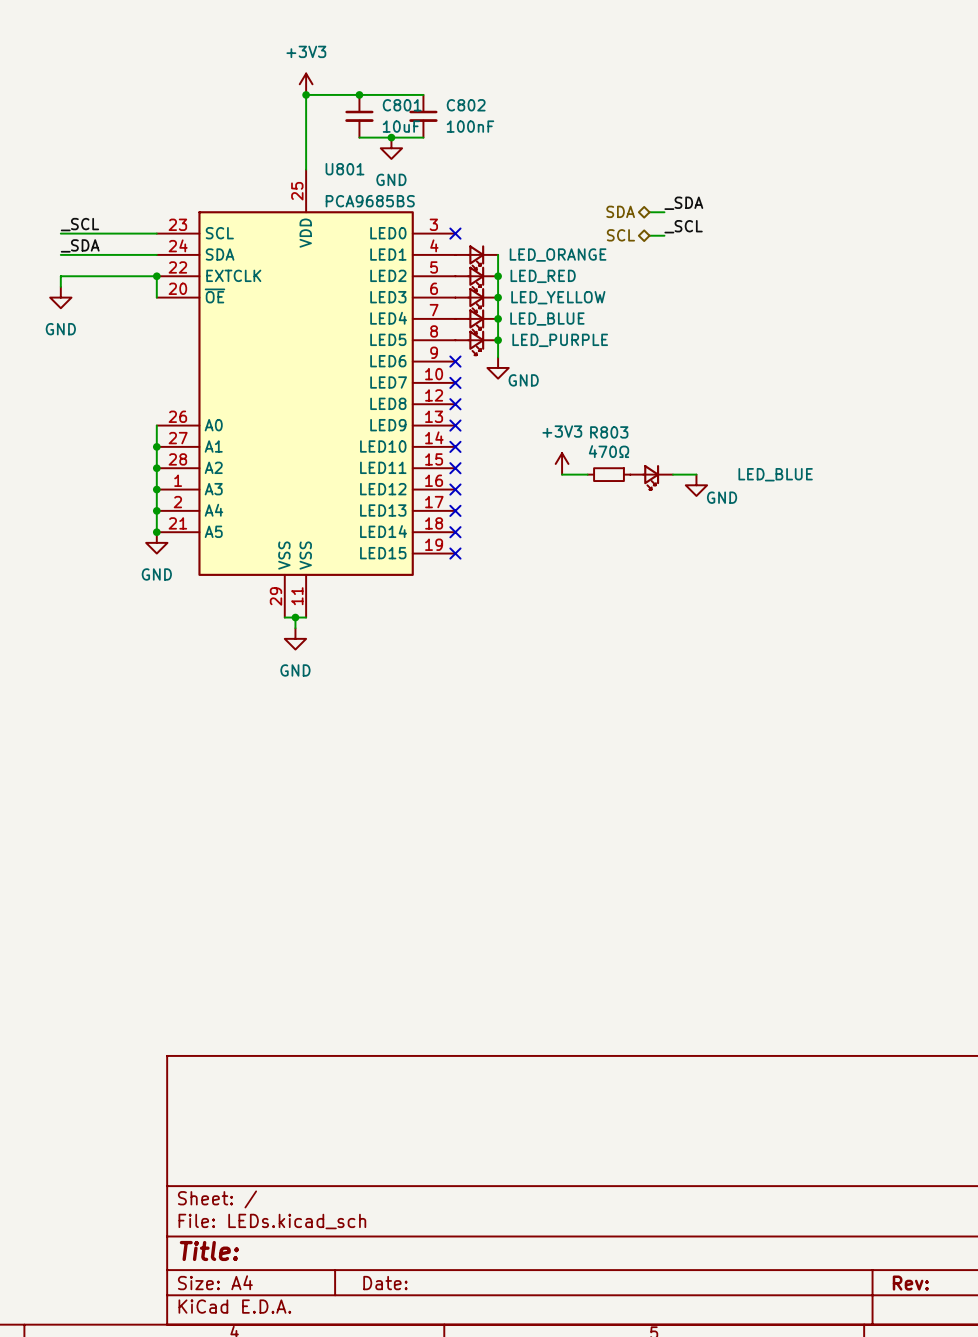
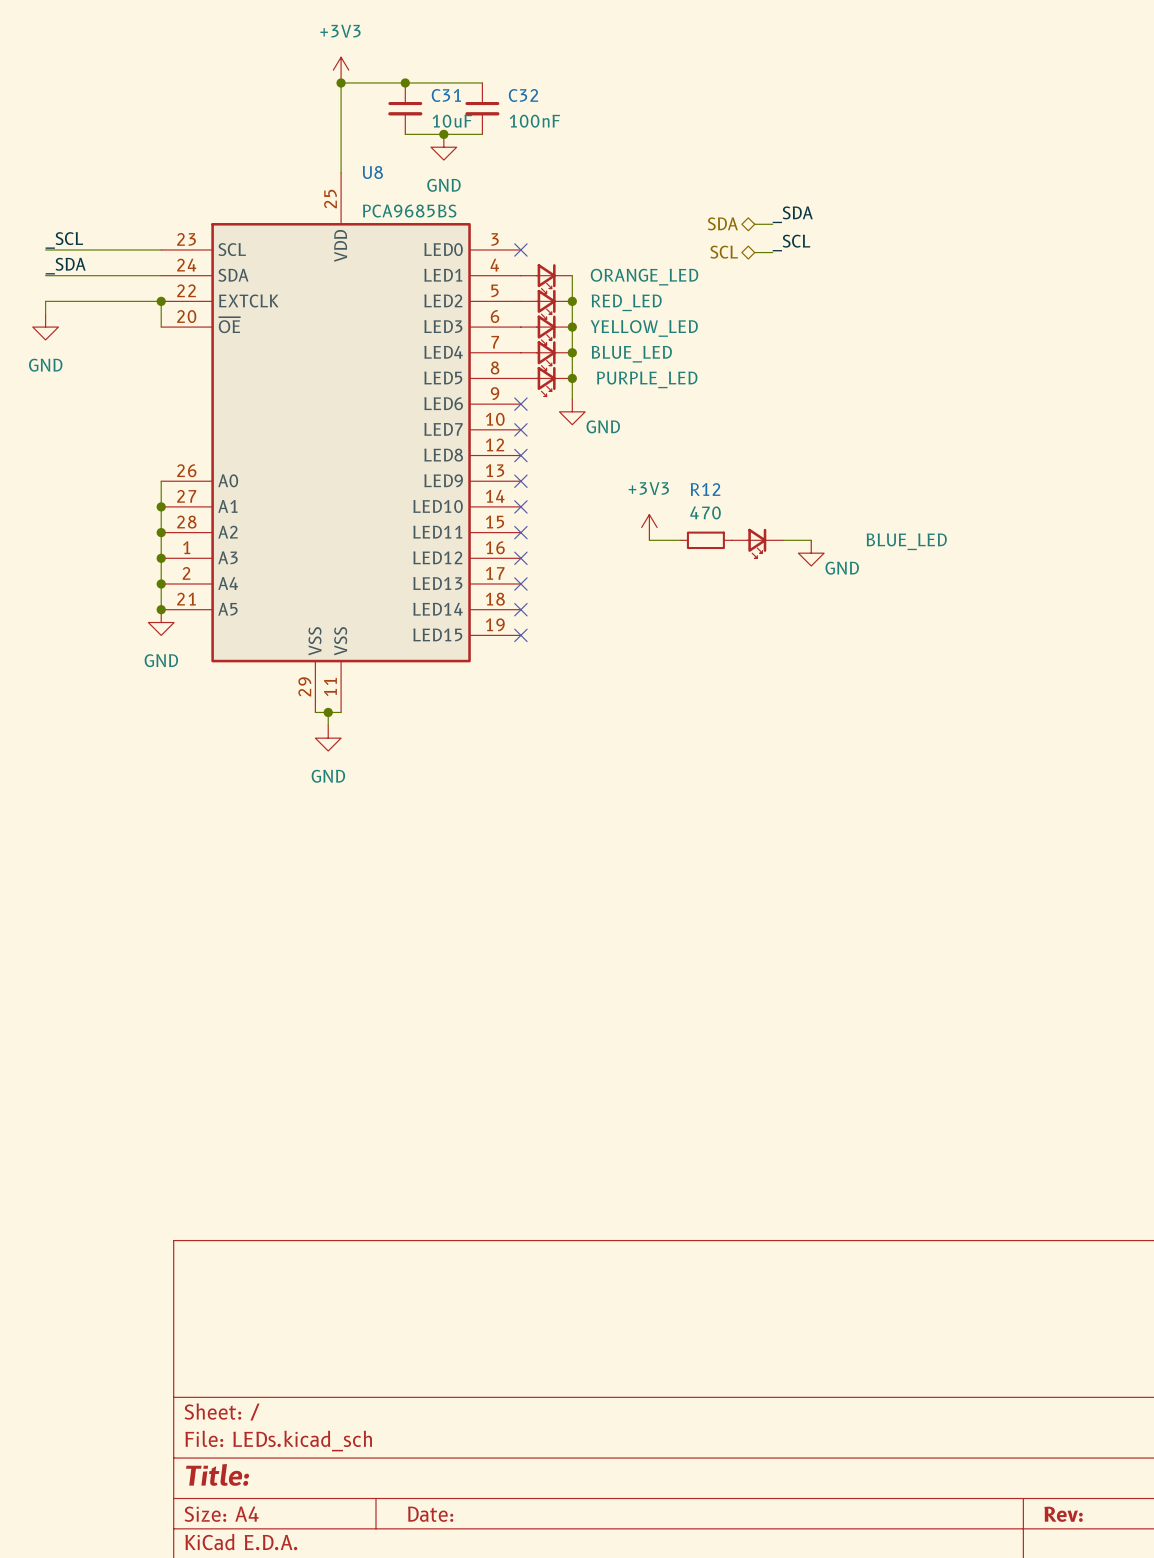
C801 name: C801 (402, 105) -> C31 (446, 95)
C802 name: C802 (466, 105) -> C32 (523, 95)
U801 name: U801 (344, 169) -> U8 (372, 172)
part value: LED_ORANGE (558, 255) -> ORANGE_LED (644, 277)
part value: LED_RED (543, 276) -> RED_LED (626, 302)
part value: LED_YELLOW (558, 297) -> YELLOW_LED (644, 328)
part value: LED_BLUE (547, 319) -> BLUE_LED (631, 354)
part value: LED_PURPLE (560, 340) -> PURPLE_LED (647, 379)
R803 name: R803 (609, 432) -> R12 (705, 489)
R803 value: 470Ω (609, 451) -> 470 (705, 512)
part value: LED_BLUE (775, 474) -> BLUE_LED (906, 541)

